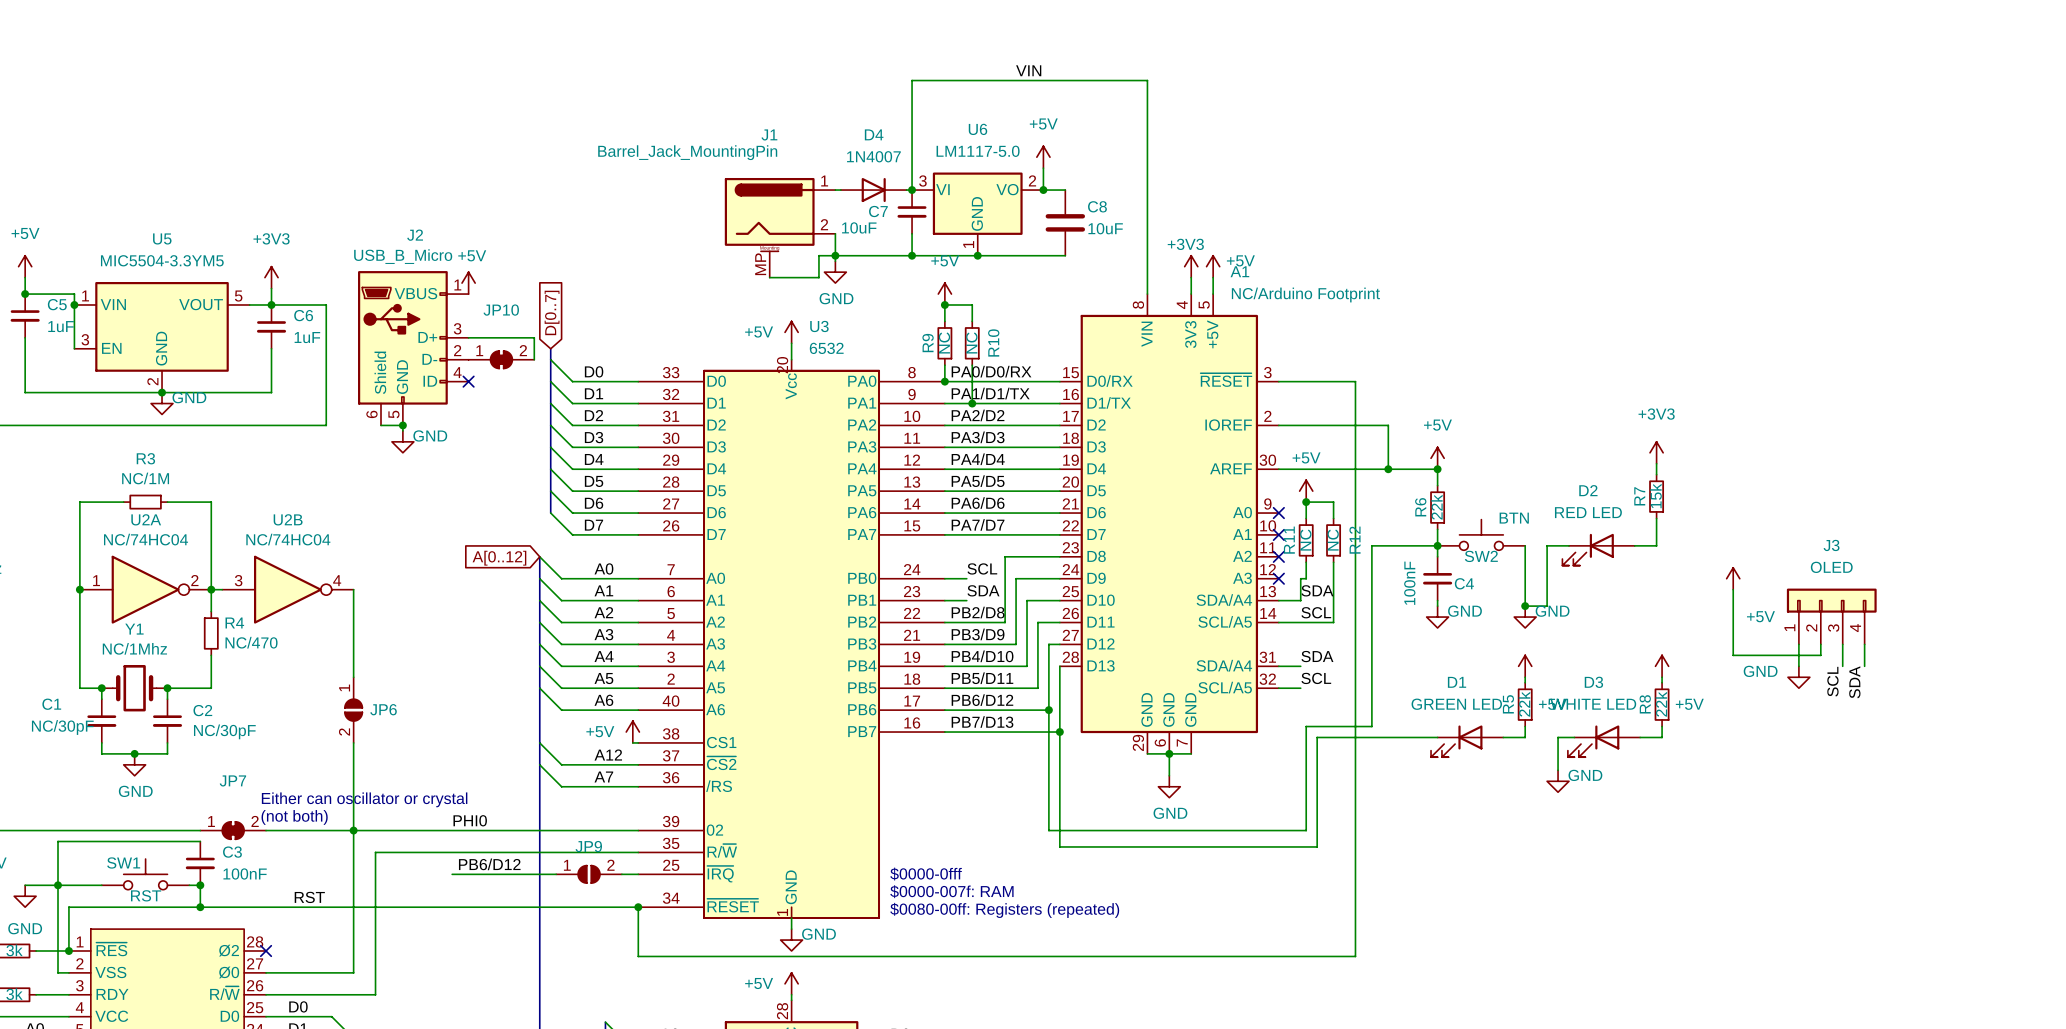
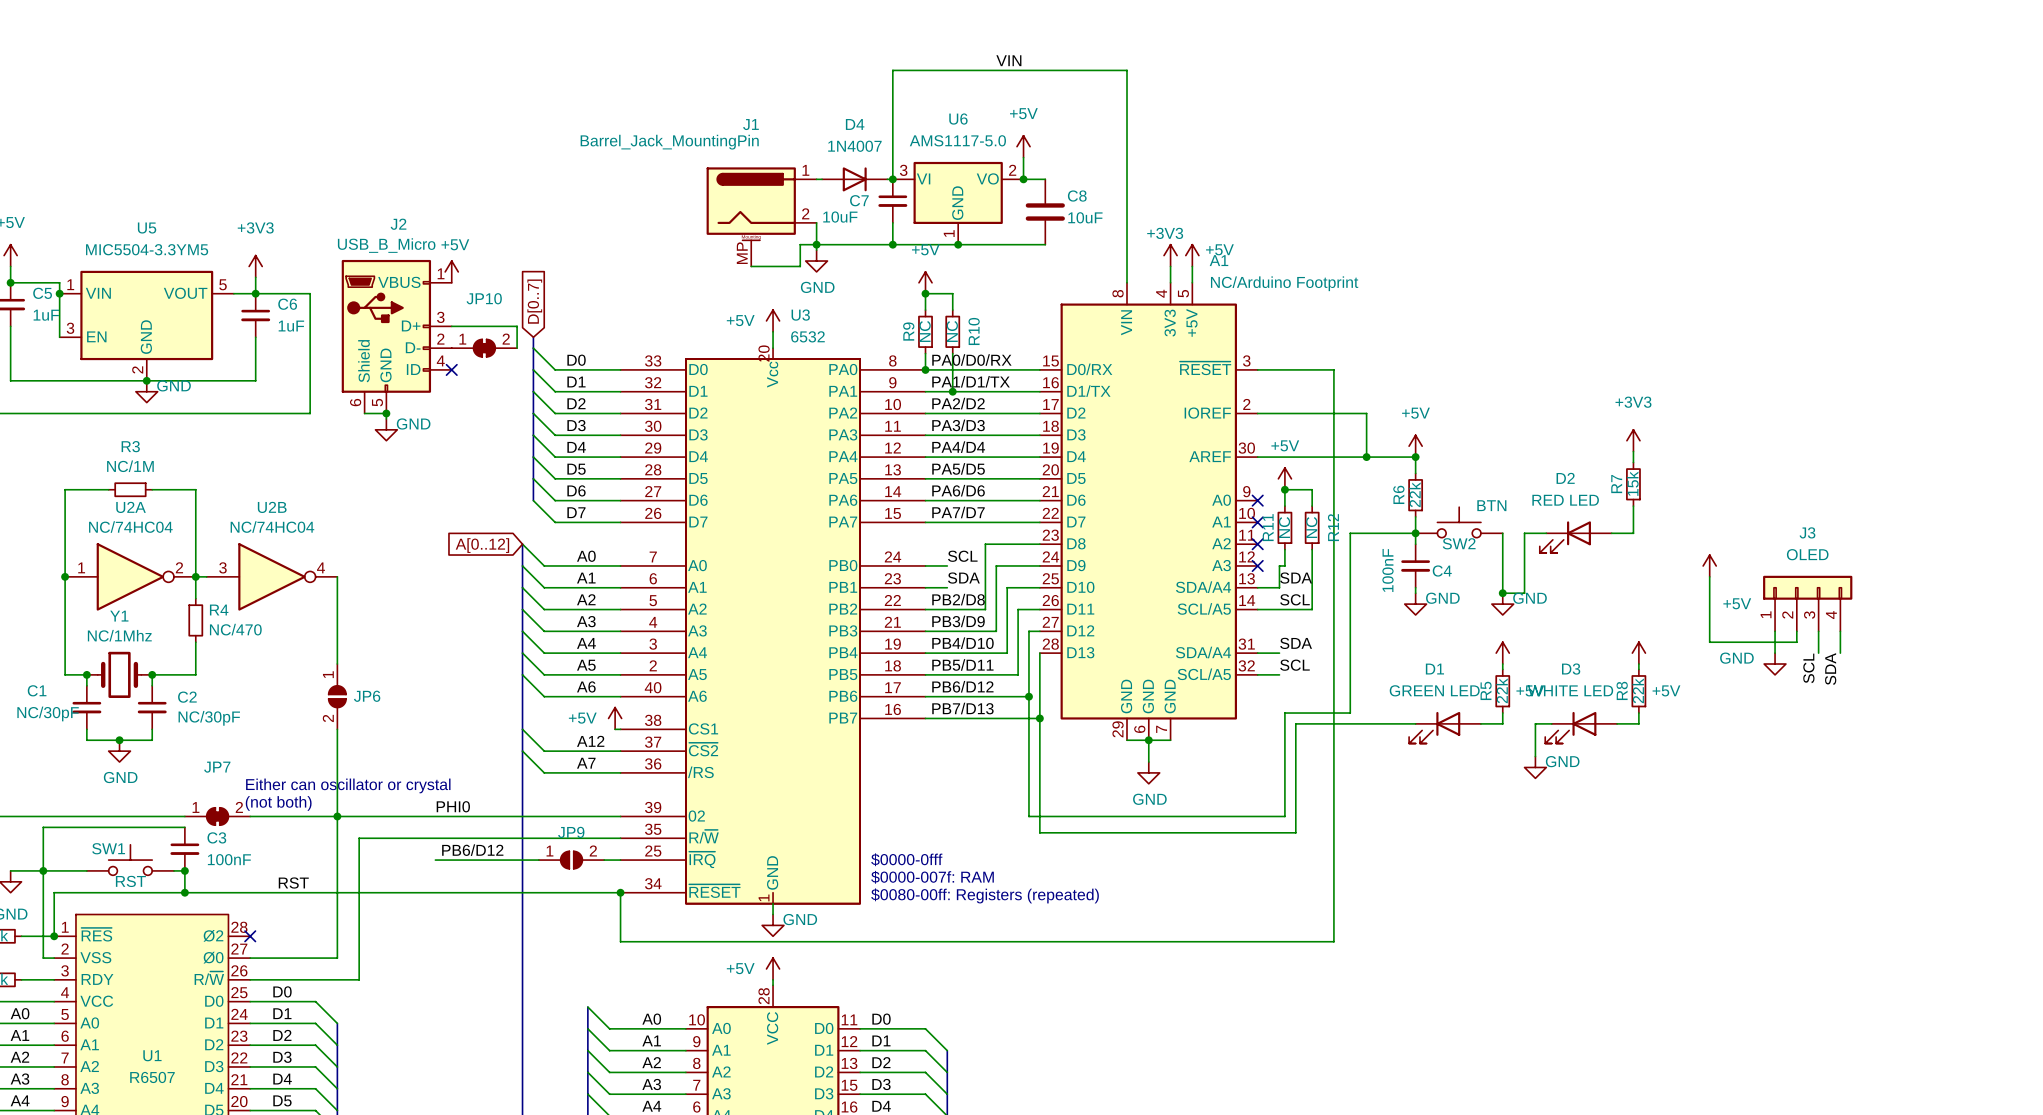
U6 value: LM1117-5.0 (978, 151) -> AMS1117-5.0 (957, 140)

